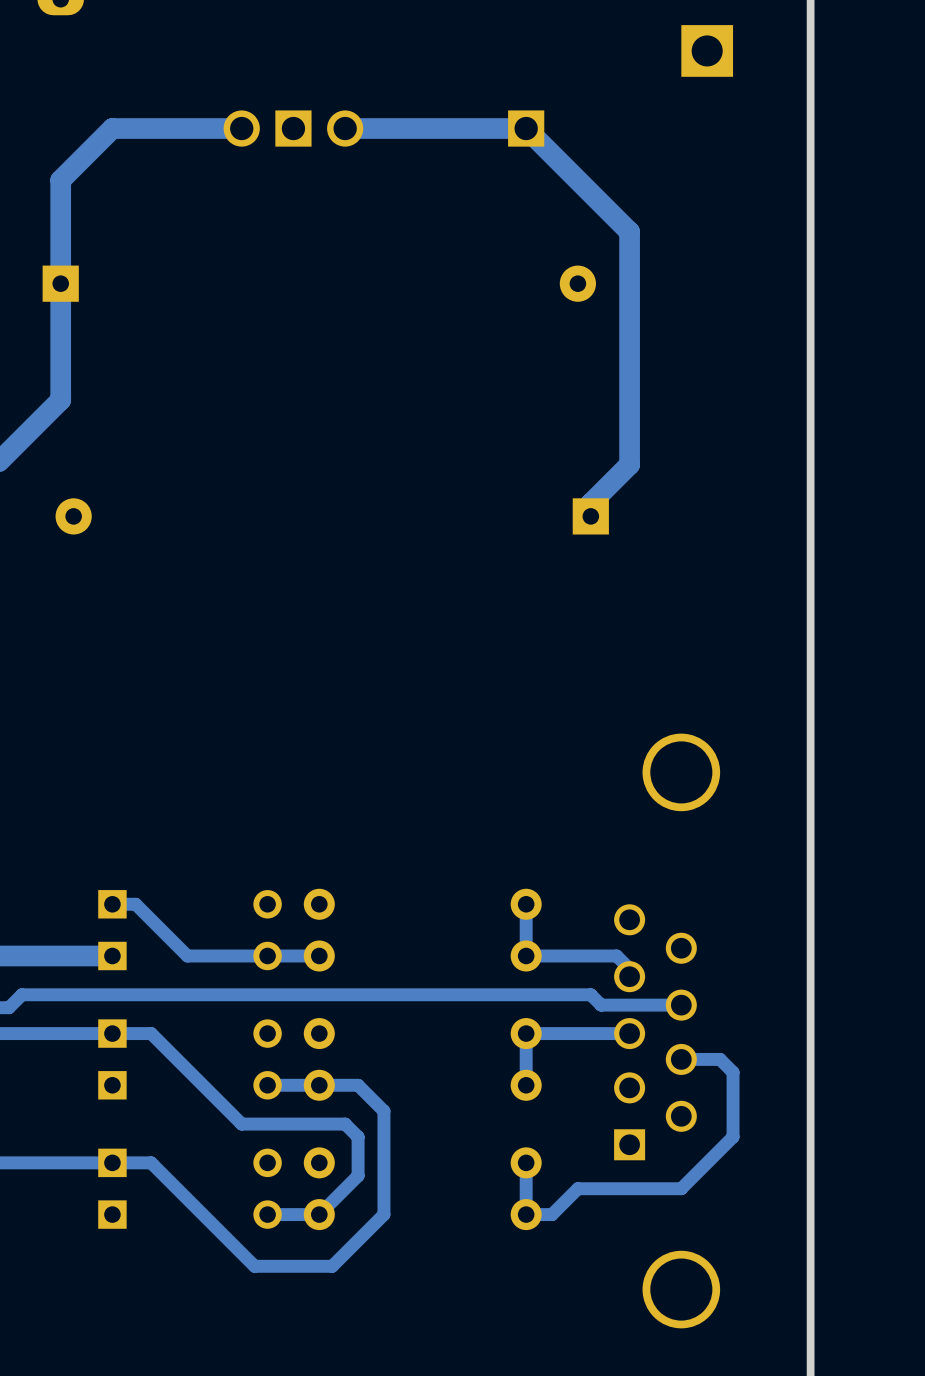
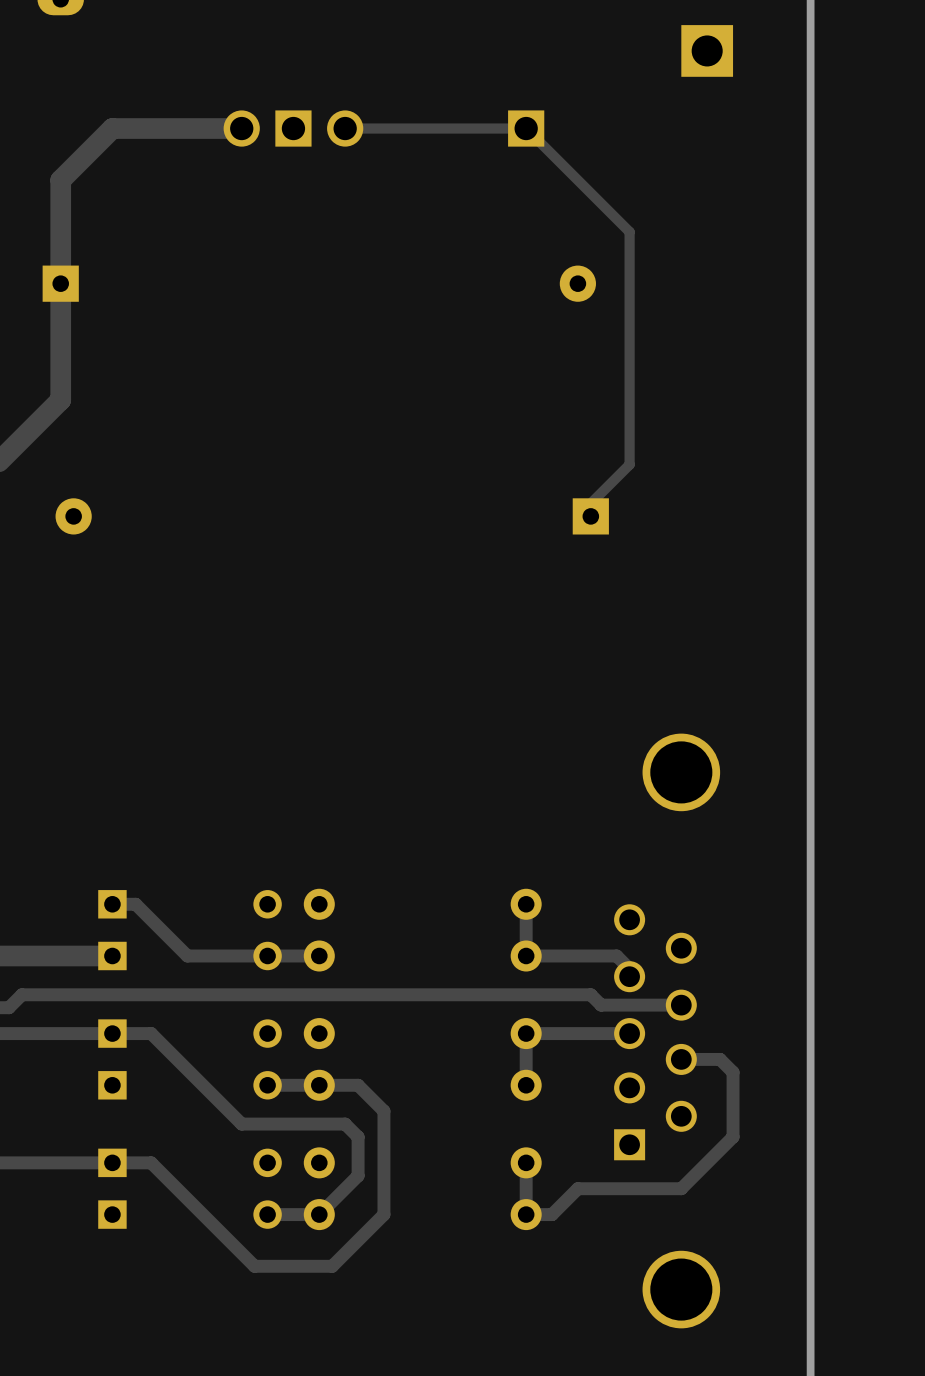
track width: thick (345, 128) (526, 128) (629, 231) (629, 464) (590, 503) (590, 516) -> thin (345, 128) (526, 128) (629, 231) (629, 464) (590, 503) (590, 516)

